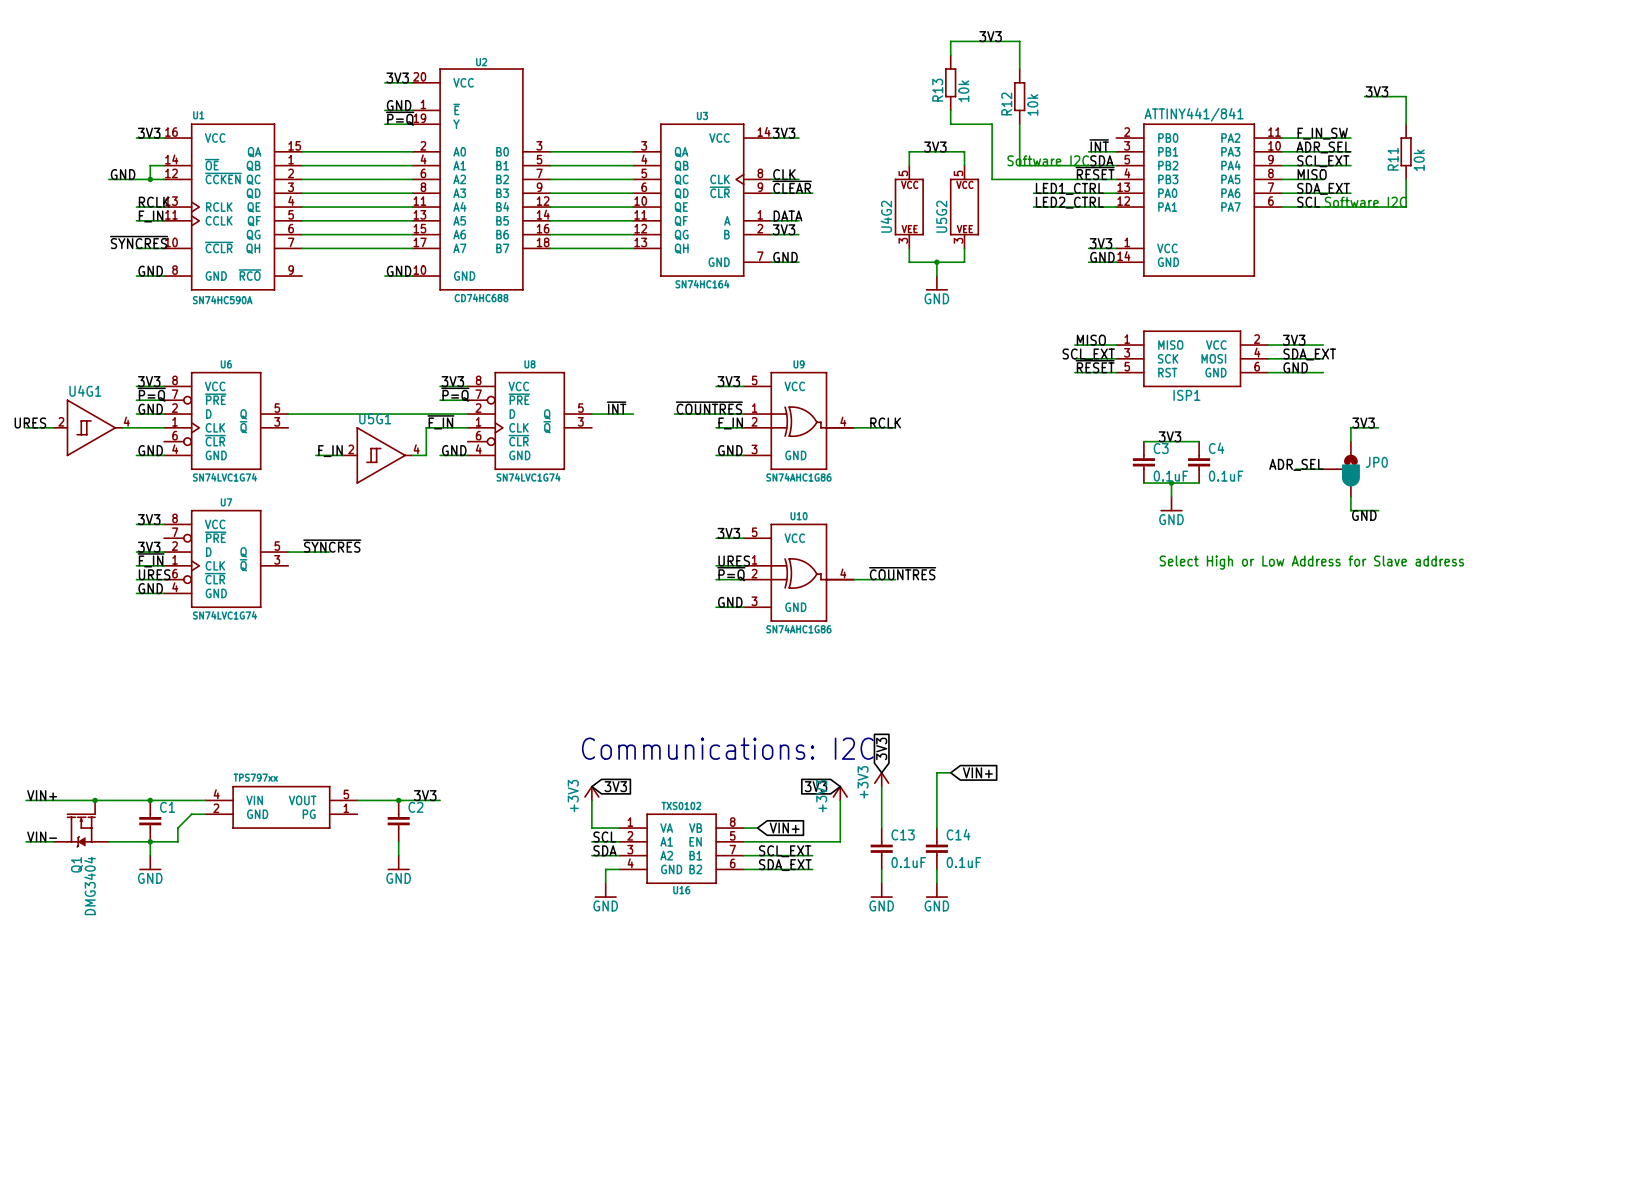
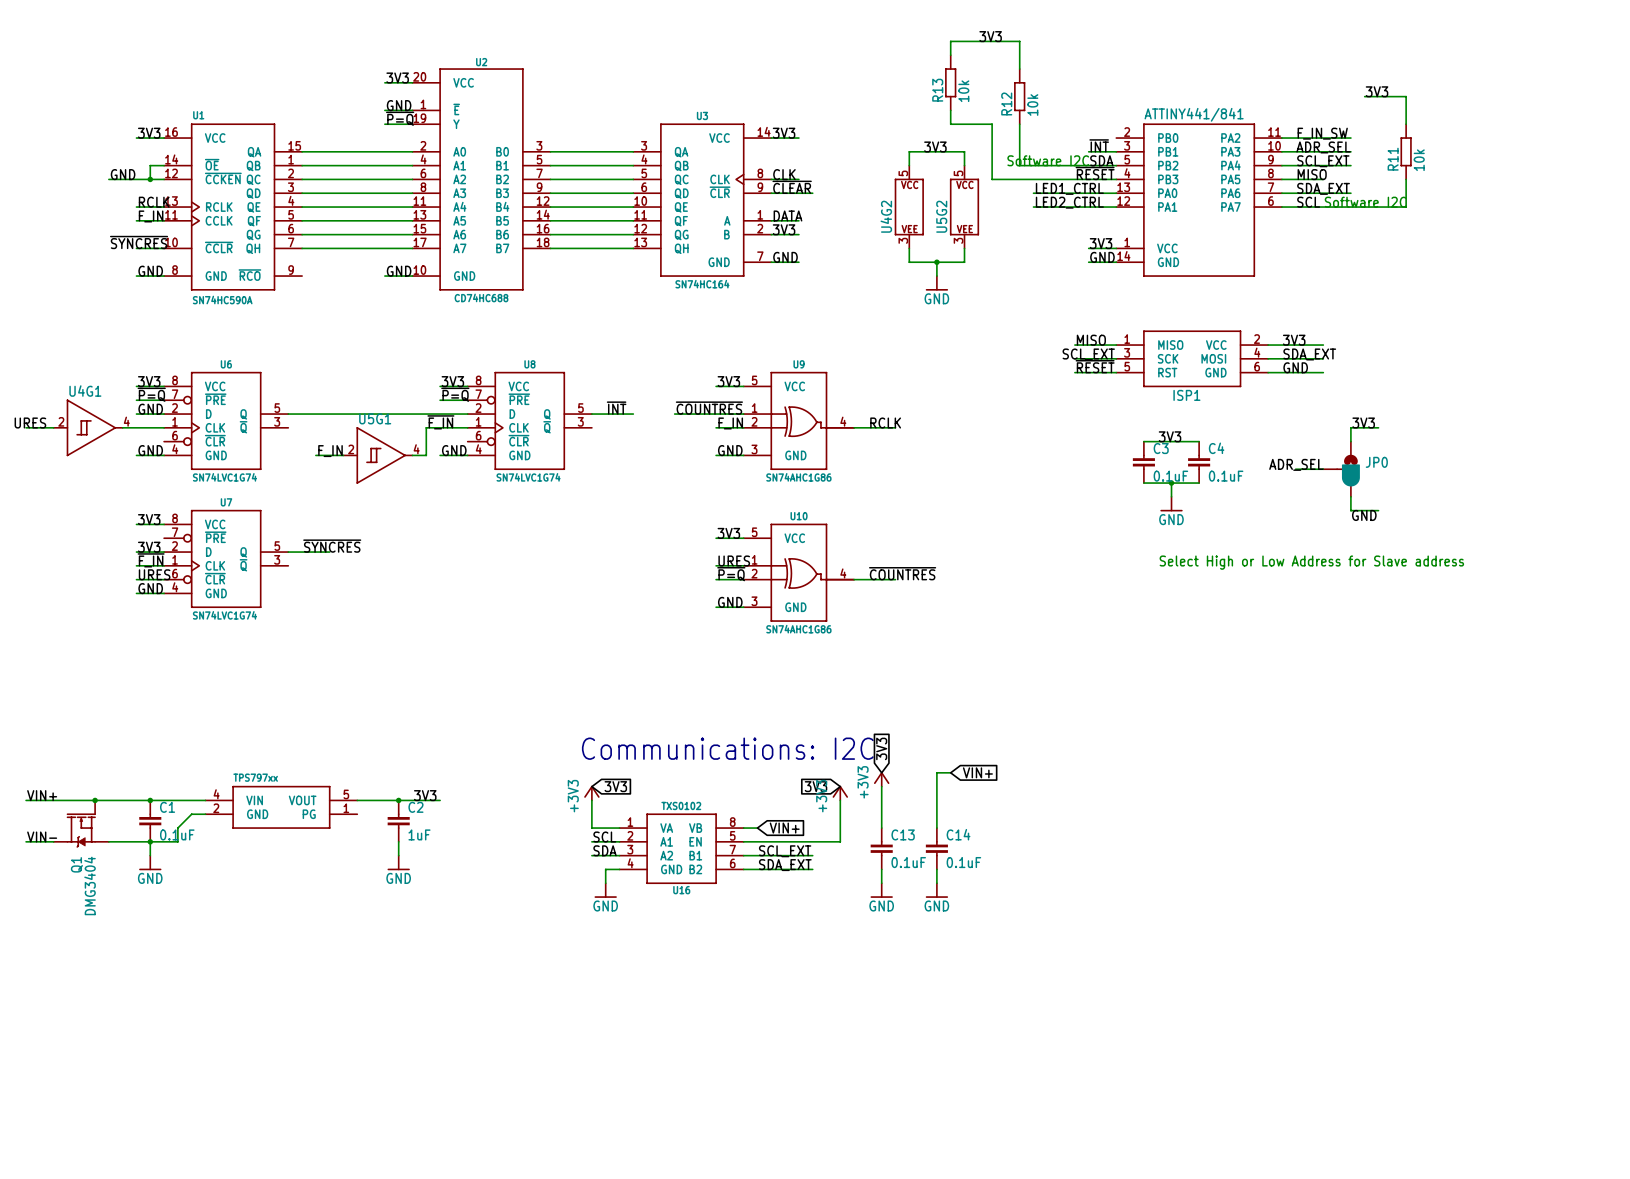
C1 value: none -> 0.1uF (177, 834)
C2 value: none -> 1uF (419, 834)

